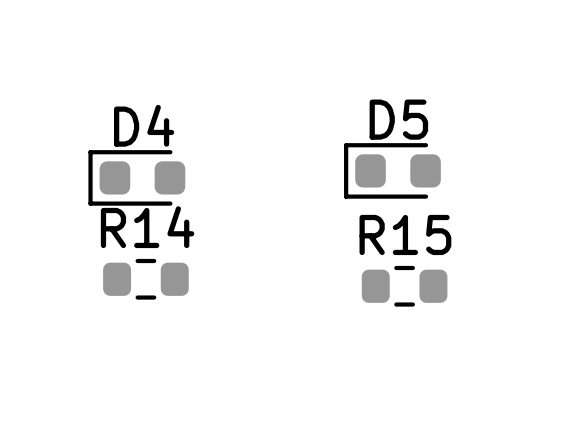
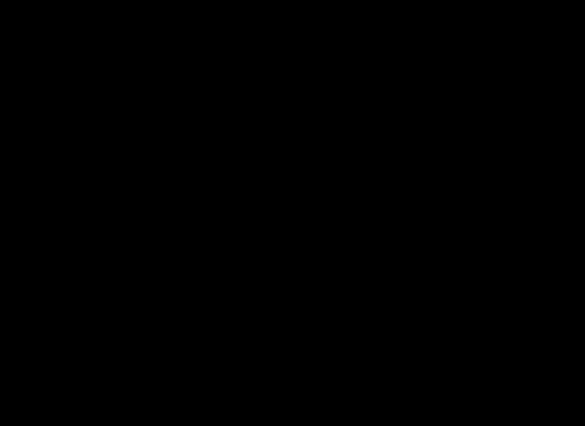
D5: (392, 170) -> none
D4: (136, 177) -> none
R14: (145, 279) -> none
R15: (404, 286) -> none

